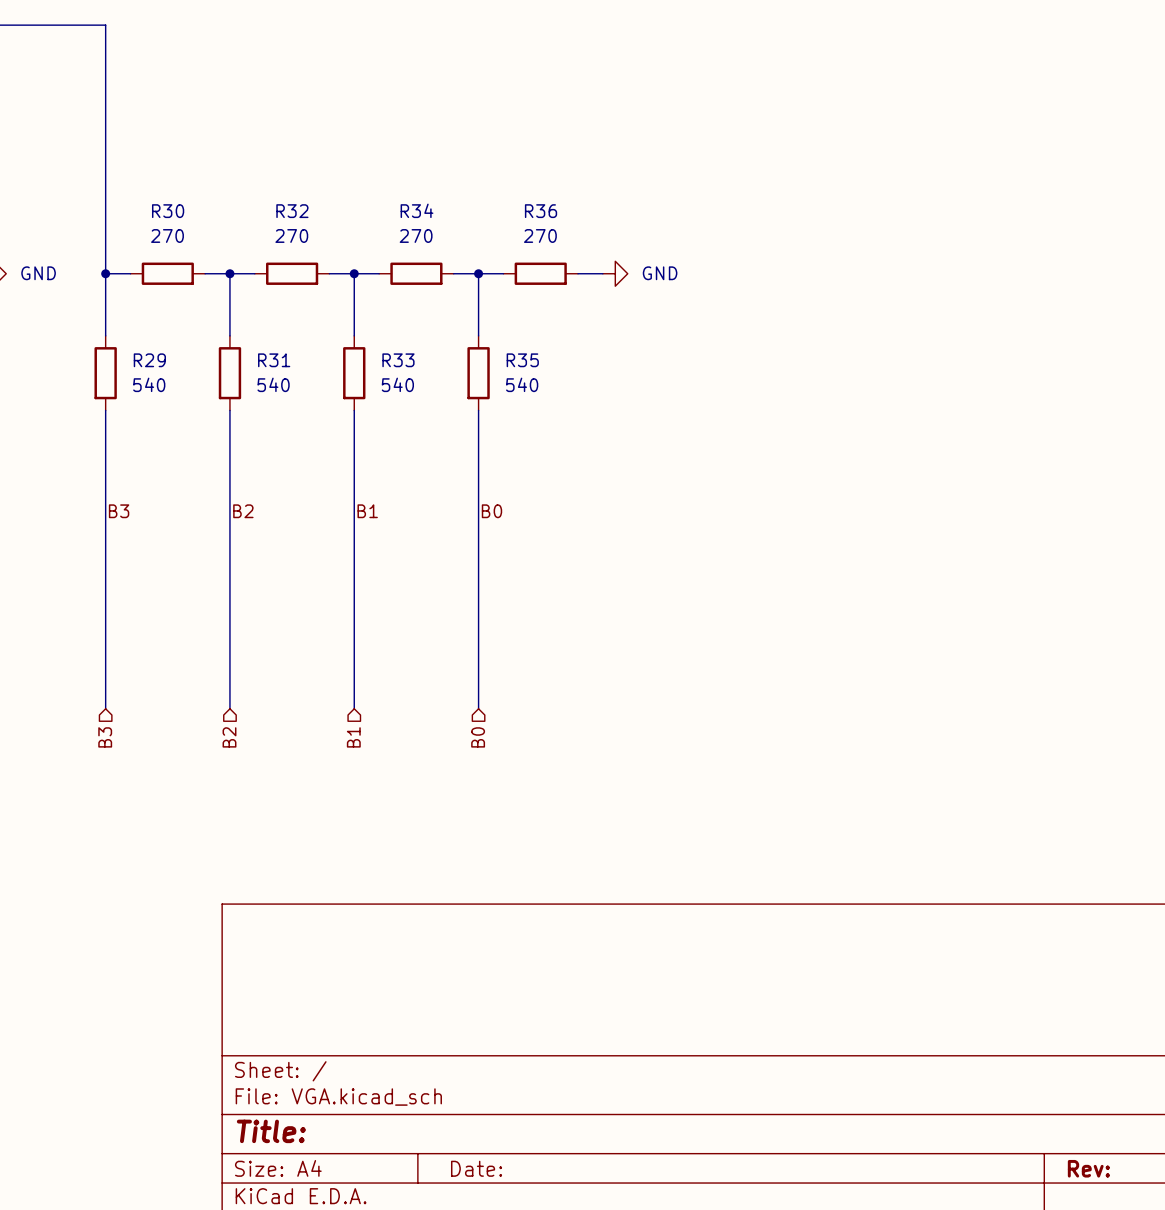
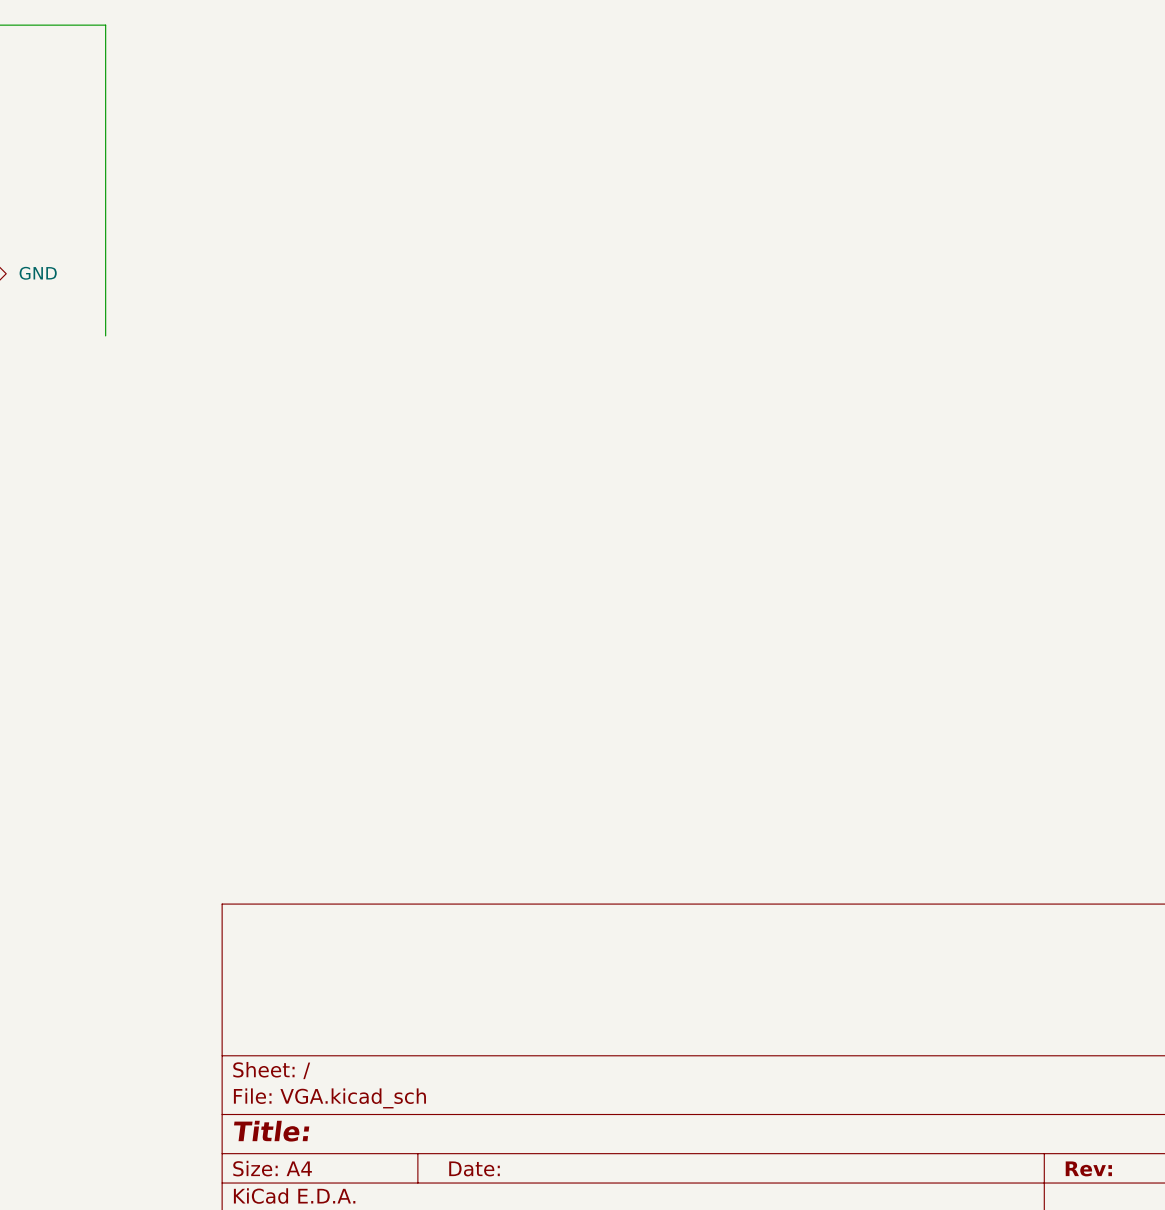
wire: (105, 273) (130, 273) -> none
junction: (105, 273) -> none
R30: 270 (167, 273) -> none
wire: (205, 273) (254, 273) -> none
wire: (229, 273) (229, 335) -> none
junction: (229, 273) -> none
R32: 270 (292, 273) -> none
wire: (329, 273) (379, 273) -> none
wire: (354, 273) (354, 335) -> none
junction: (354, 273) -> none
R34: 270 (416, 273) -> none
wire: (453, 273) (503, 273) -> none
wire: (478, 273) (478, 335) -> none
junction: (478, 273) -> none
R36: 270 (540, 273) -> none
wire: (578, 273) (602, 273) -> none
power symbol: GND (615, 273) -> none
R29: 540 (105, 373) -> none
R31: 540 (229, 373) -> none
R33: 540 (354, 373) -> none
R35: 540 (478, 373) -> none
wire: (105, 410) (105, 708) -> none
wire: (229, 410) (229, 708) -> none
wire: (354, 410) (354, 708) -> none
wire: (478, 410) (478, 708) -> none
label: B3 (119, 511) -> none
label: B2 (243, 511) -> none
label: B1 (367, 511) -> none
label: B0 (491, 511) -> none
hierarchical label: B3 (105, 737) -> none
hierarchical label: B2 (229, 737) -> none
hierarchical label: B1 (353, 737) -> none
hierarchical label: B0 (478, 737) -> none

